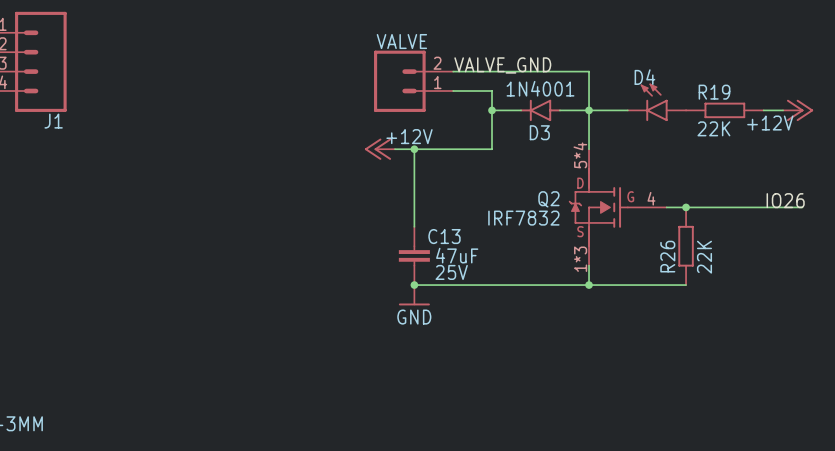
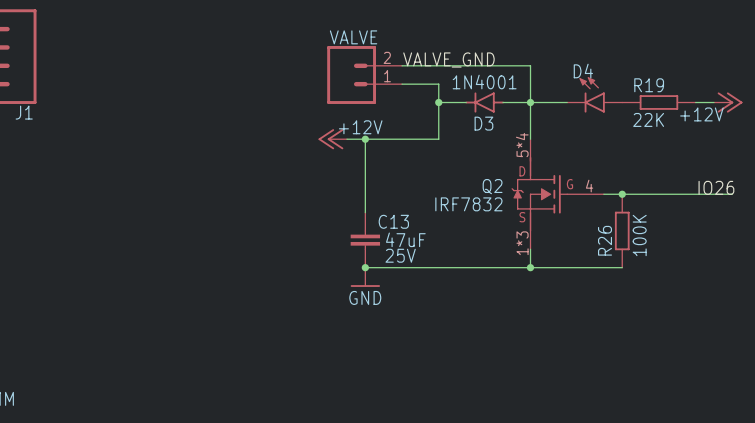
R26 value: 22K (704, 257) -> 100K (639, 235)

